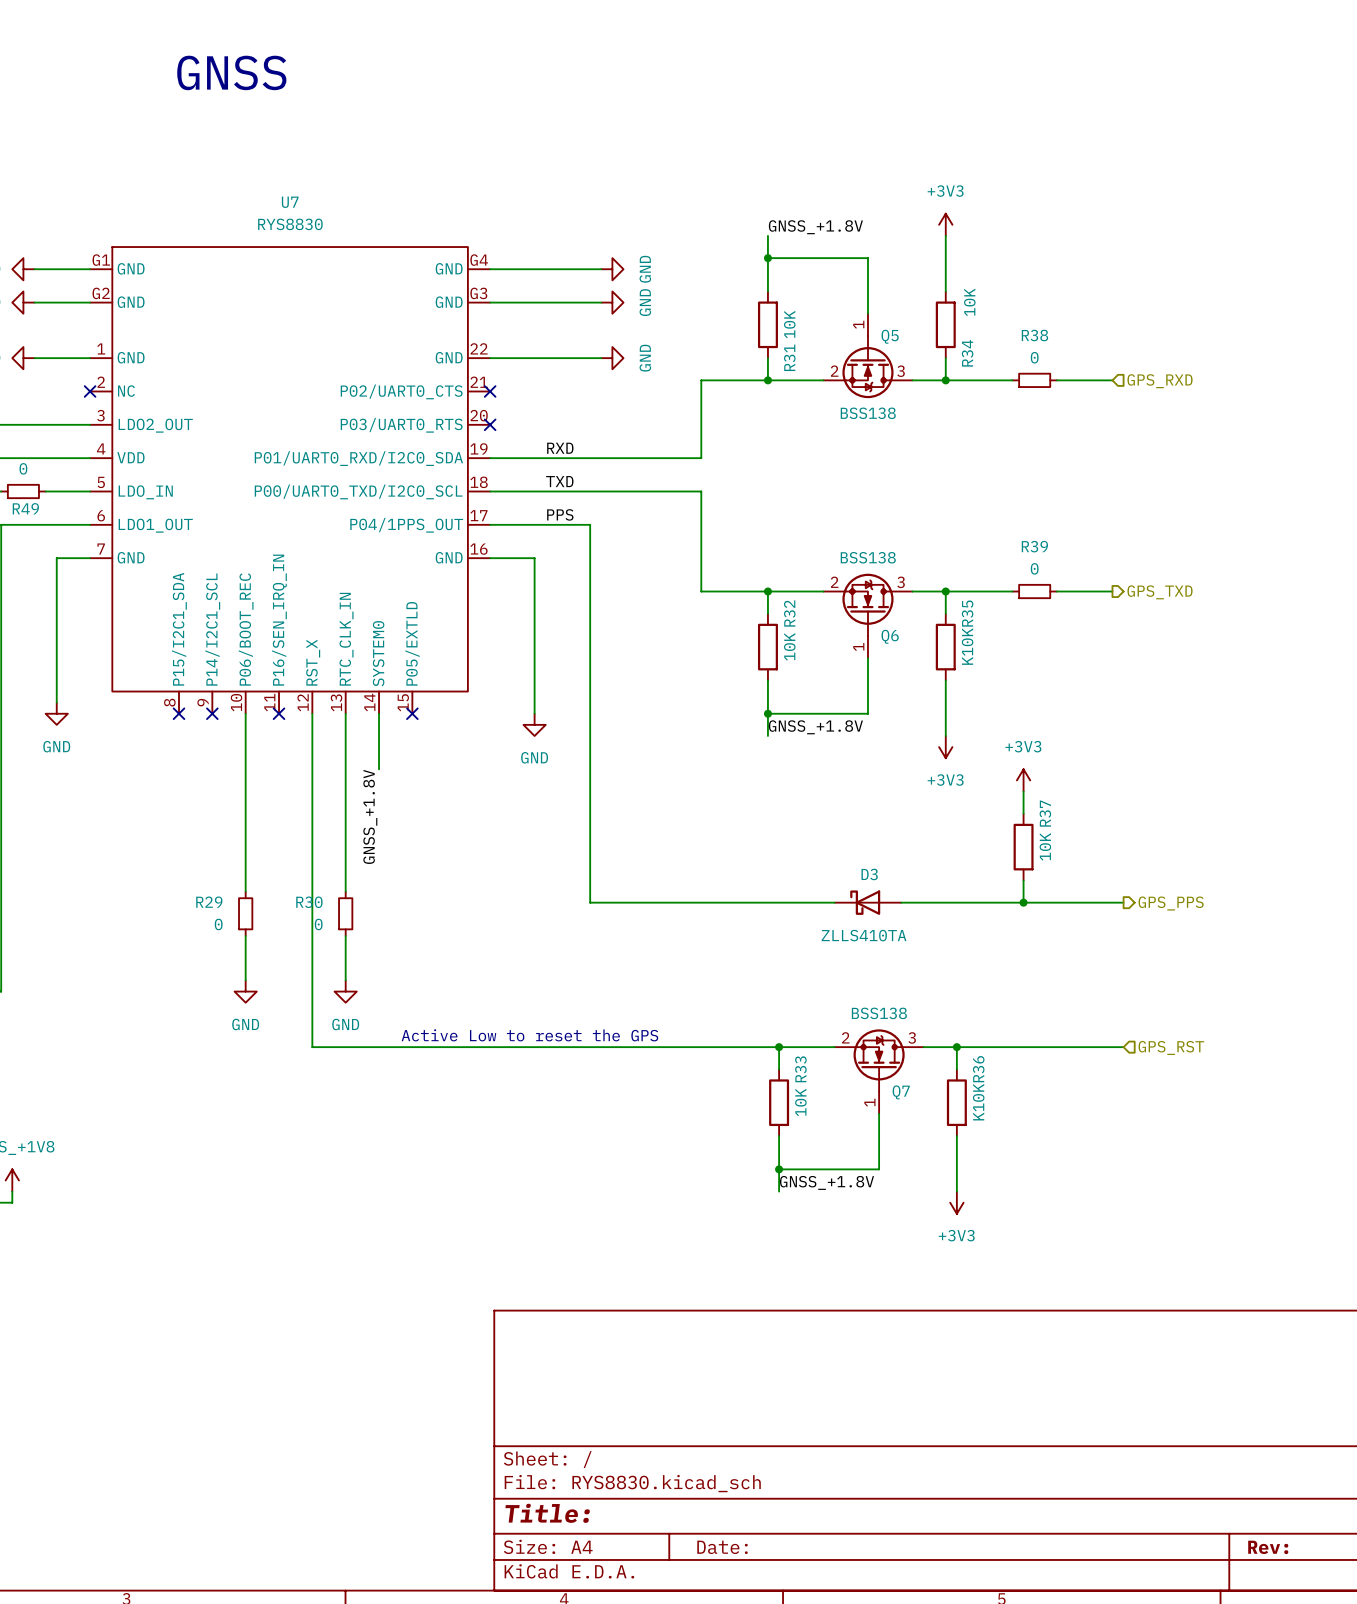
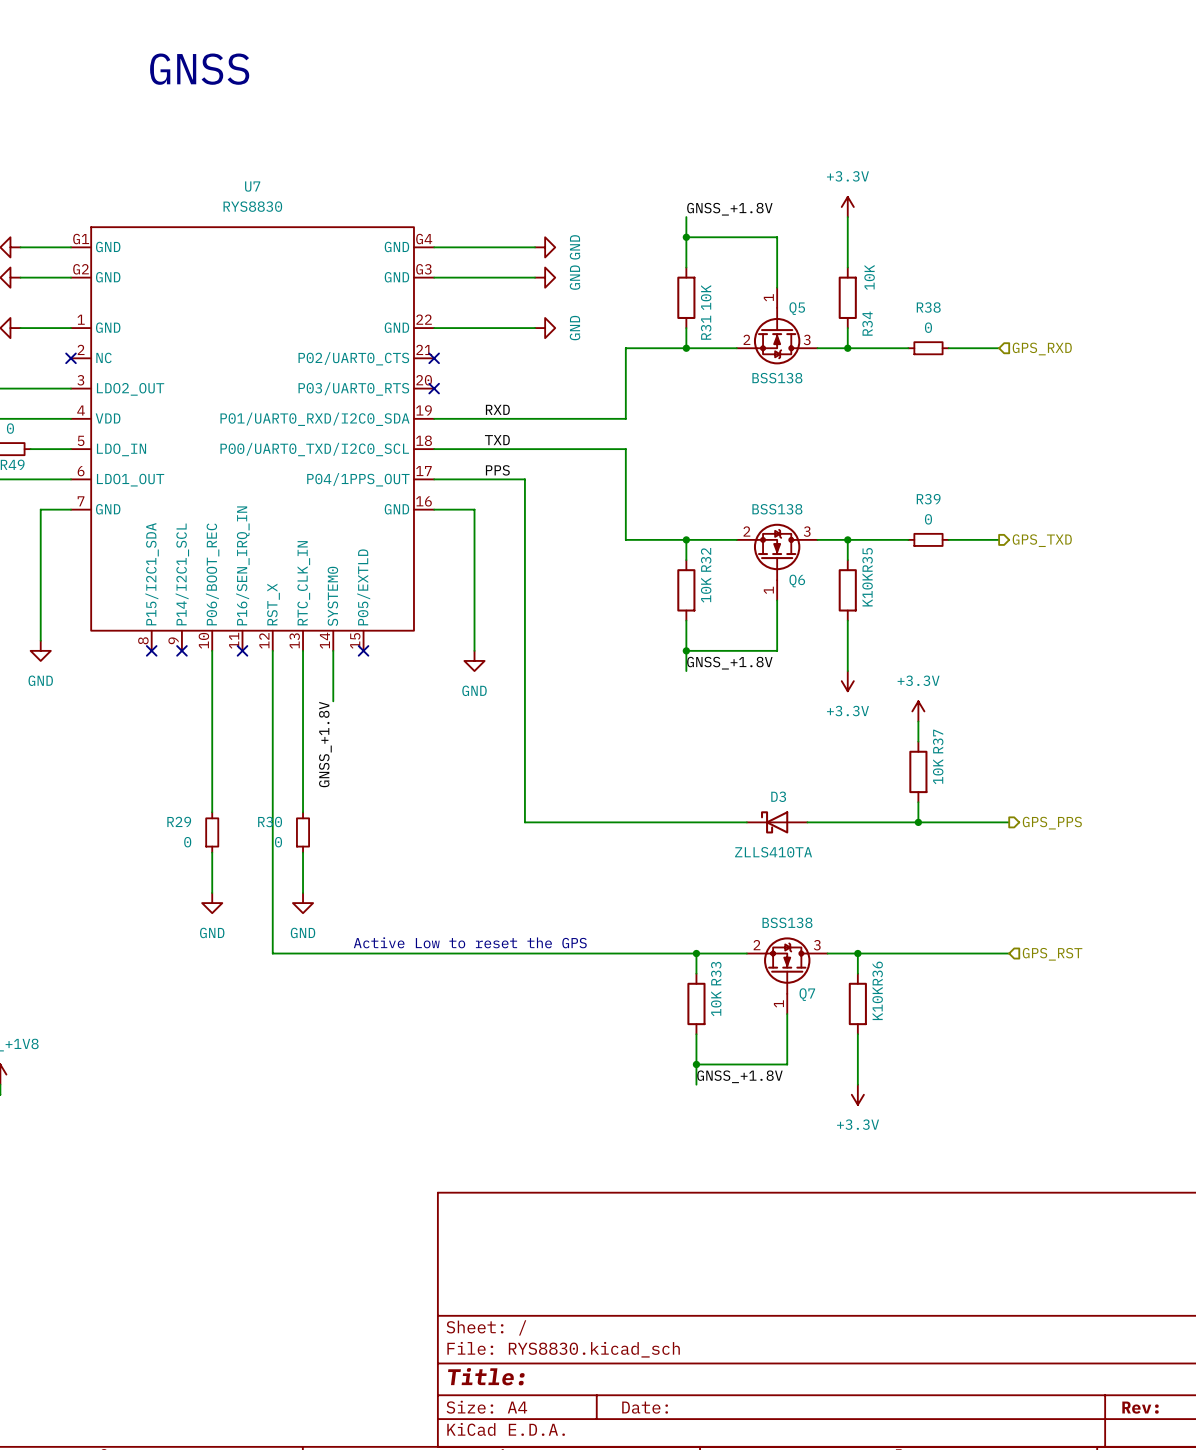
power symbol: +3V3 (945, 224) -> +3.3V (847, 207)
power symbol: +3V3 (945, 747) -> +3.3V (847, 681)
power symbol: +3V3 (1023, 780) -> +3.3V (918, 711)
power symbol: +3V3 (956, 1202) -> +3.3V (857, 1094)

